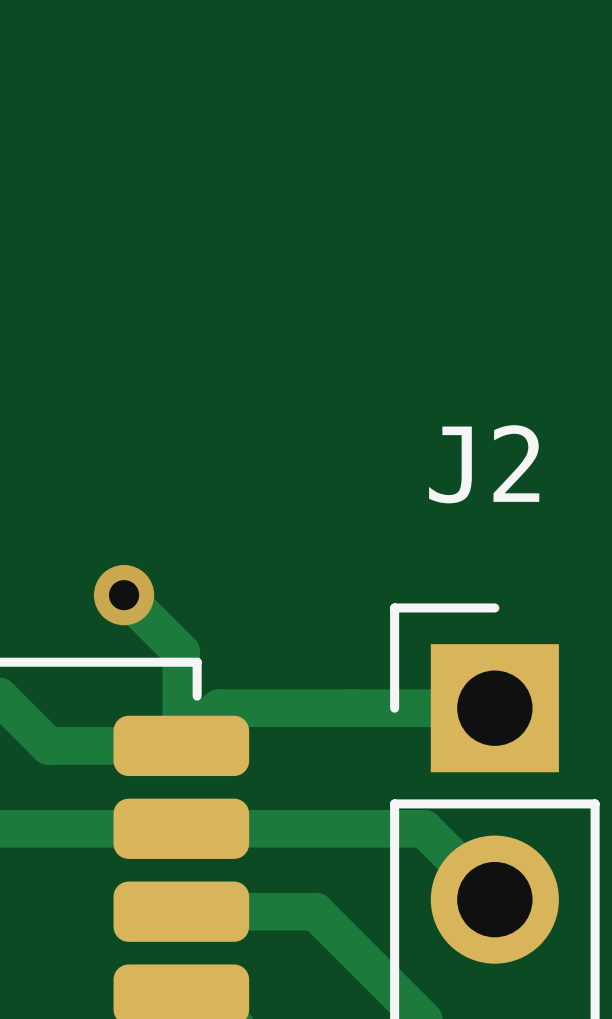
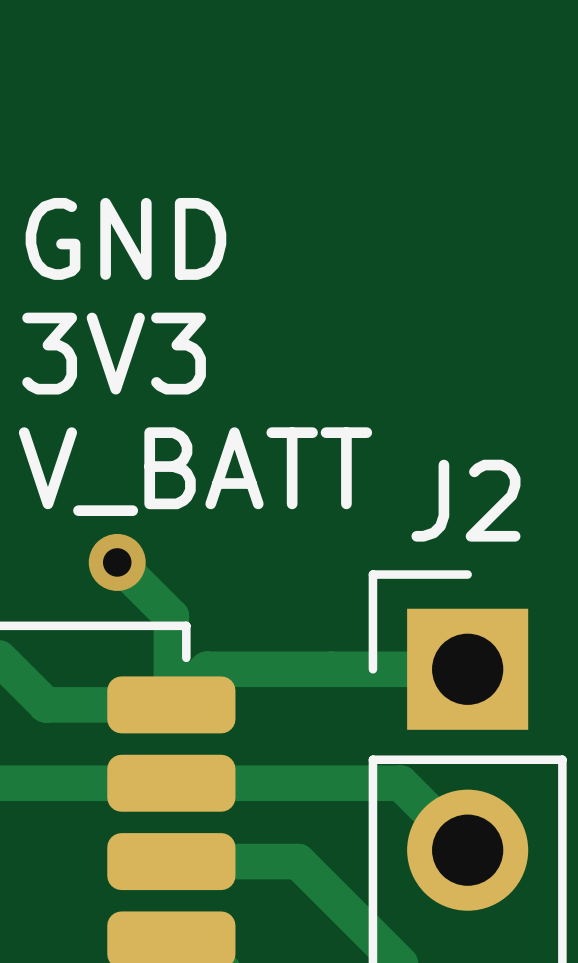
text: none -> GND (125, 238)
text: none -> 3V3 (114, 353)
J2 name position: J2 (484, 464) -> J2 (465, 500)
text: none -> V_BATT (195, 471)

